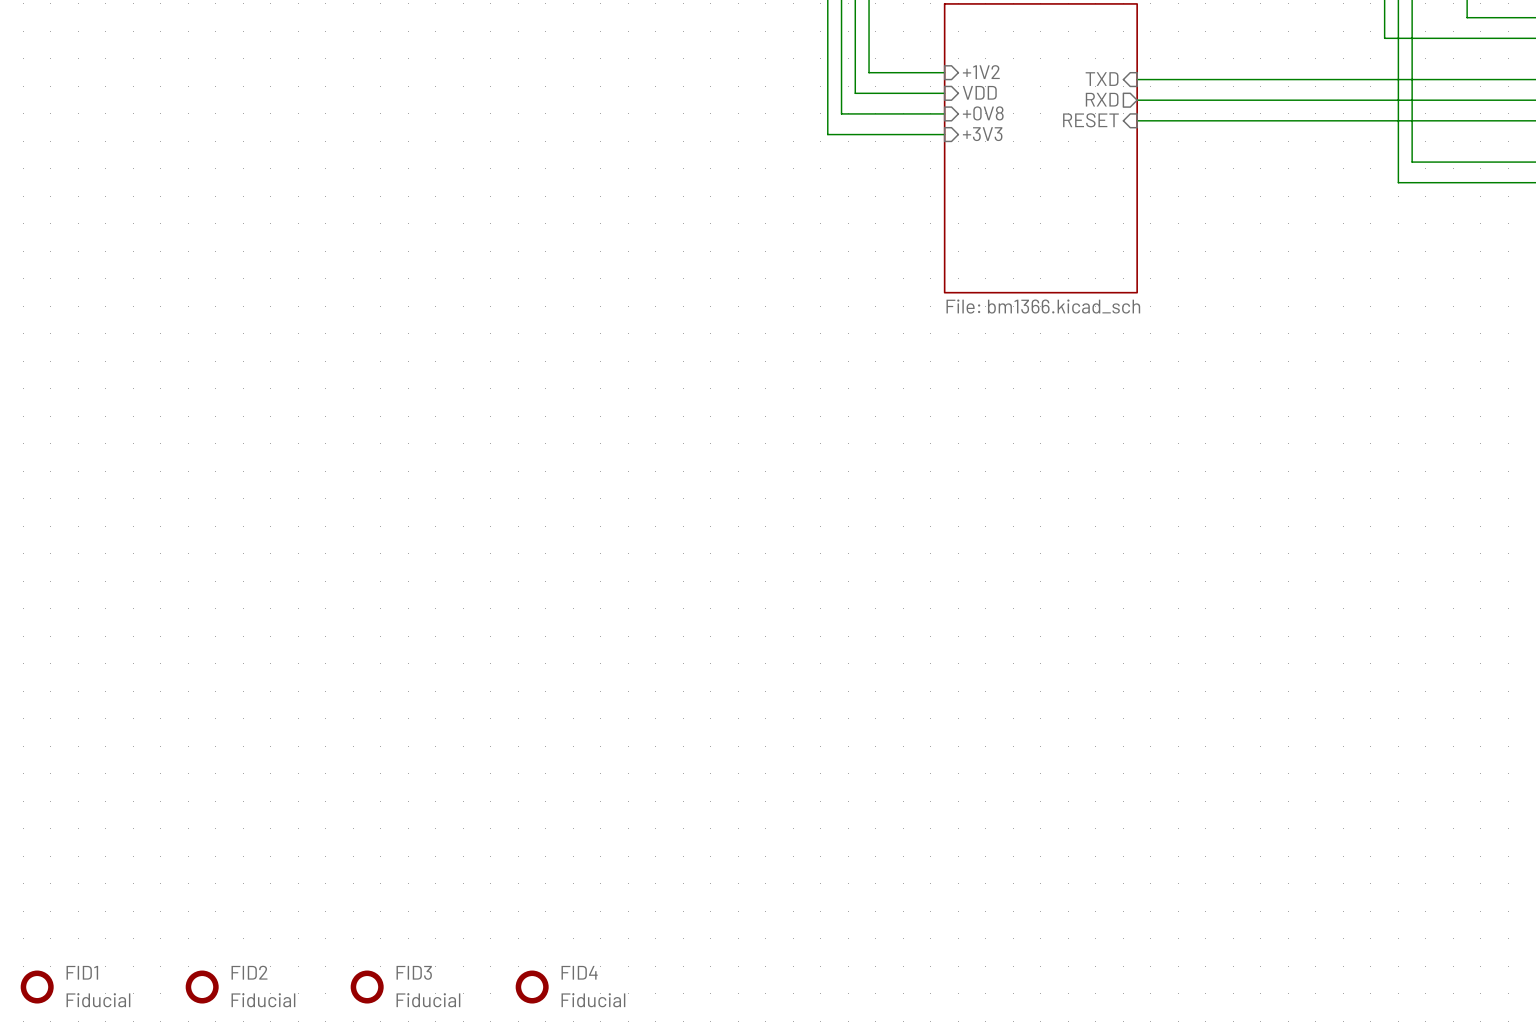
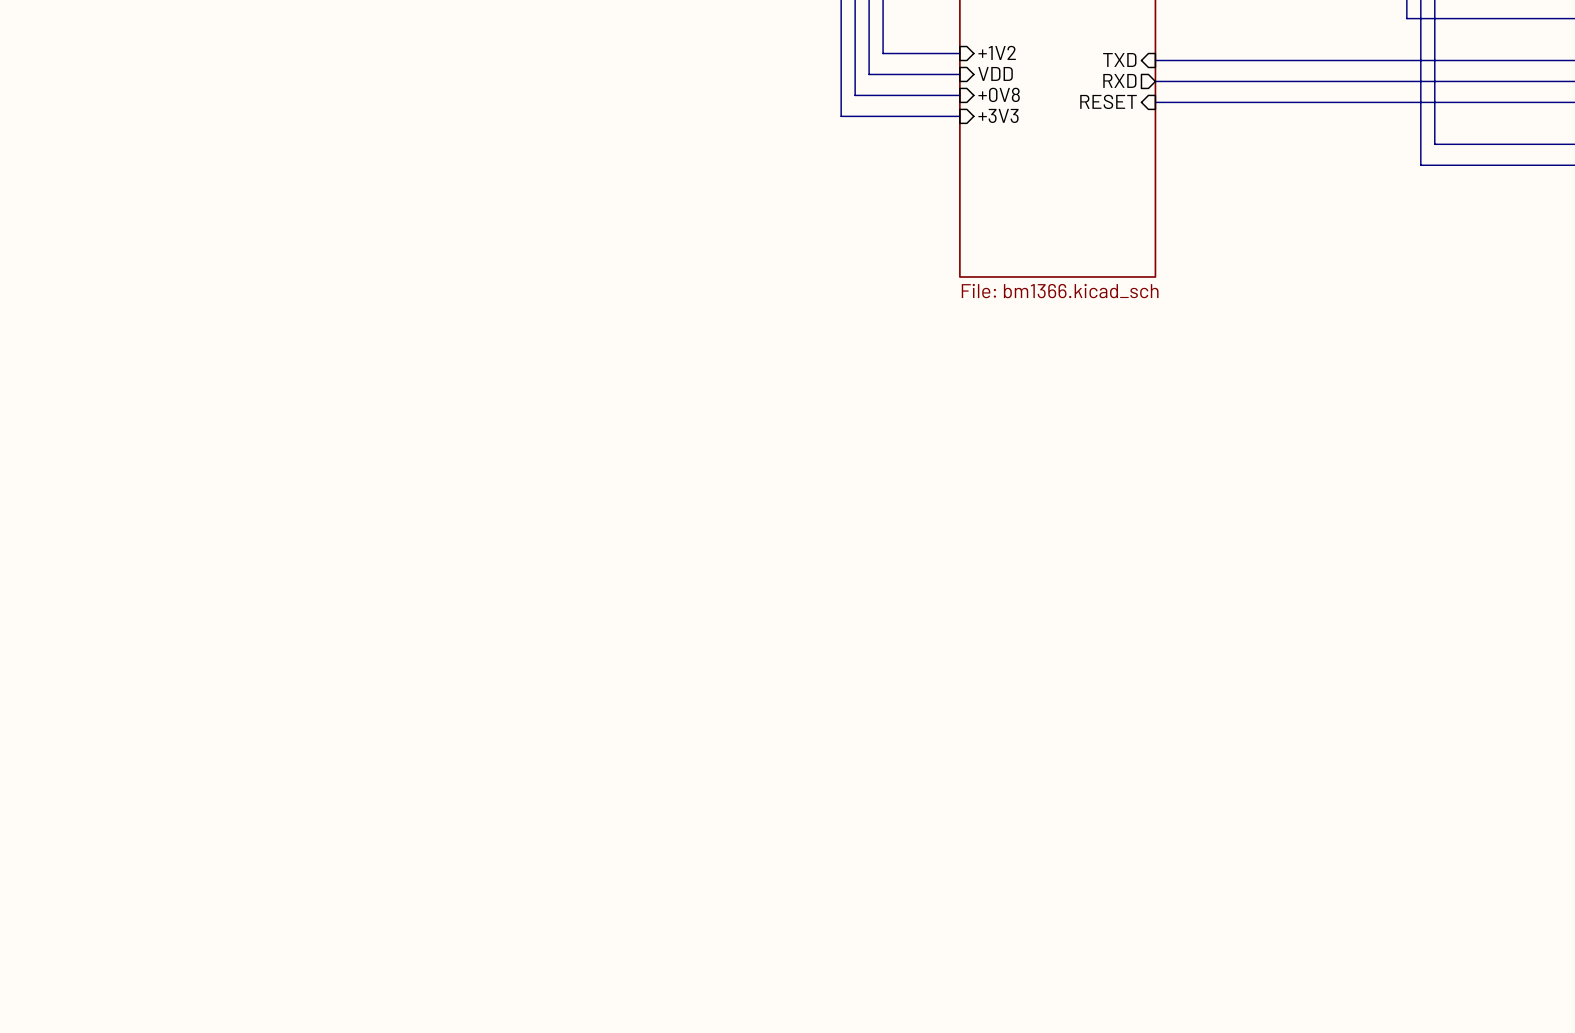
FID1: Fiducial (37, 987) -> none
FID2: Fiducial (202, 987) -> none
FID3: Fiducial (367, 987) -> none
FID4: Fiducial (532, 987) -> none

